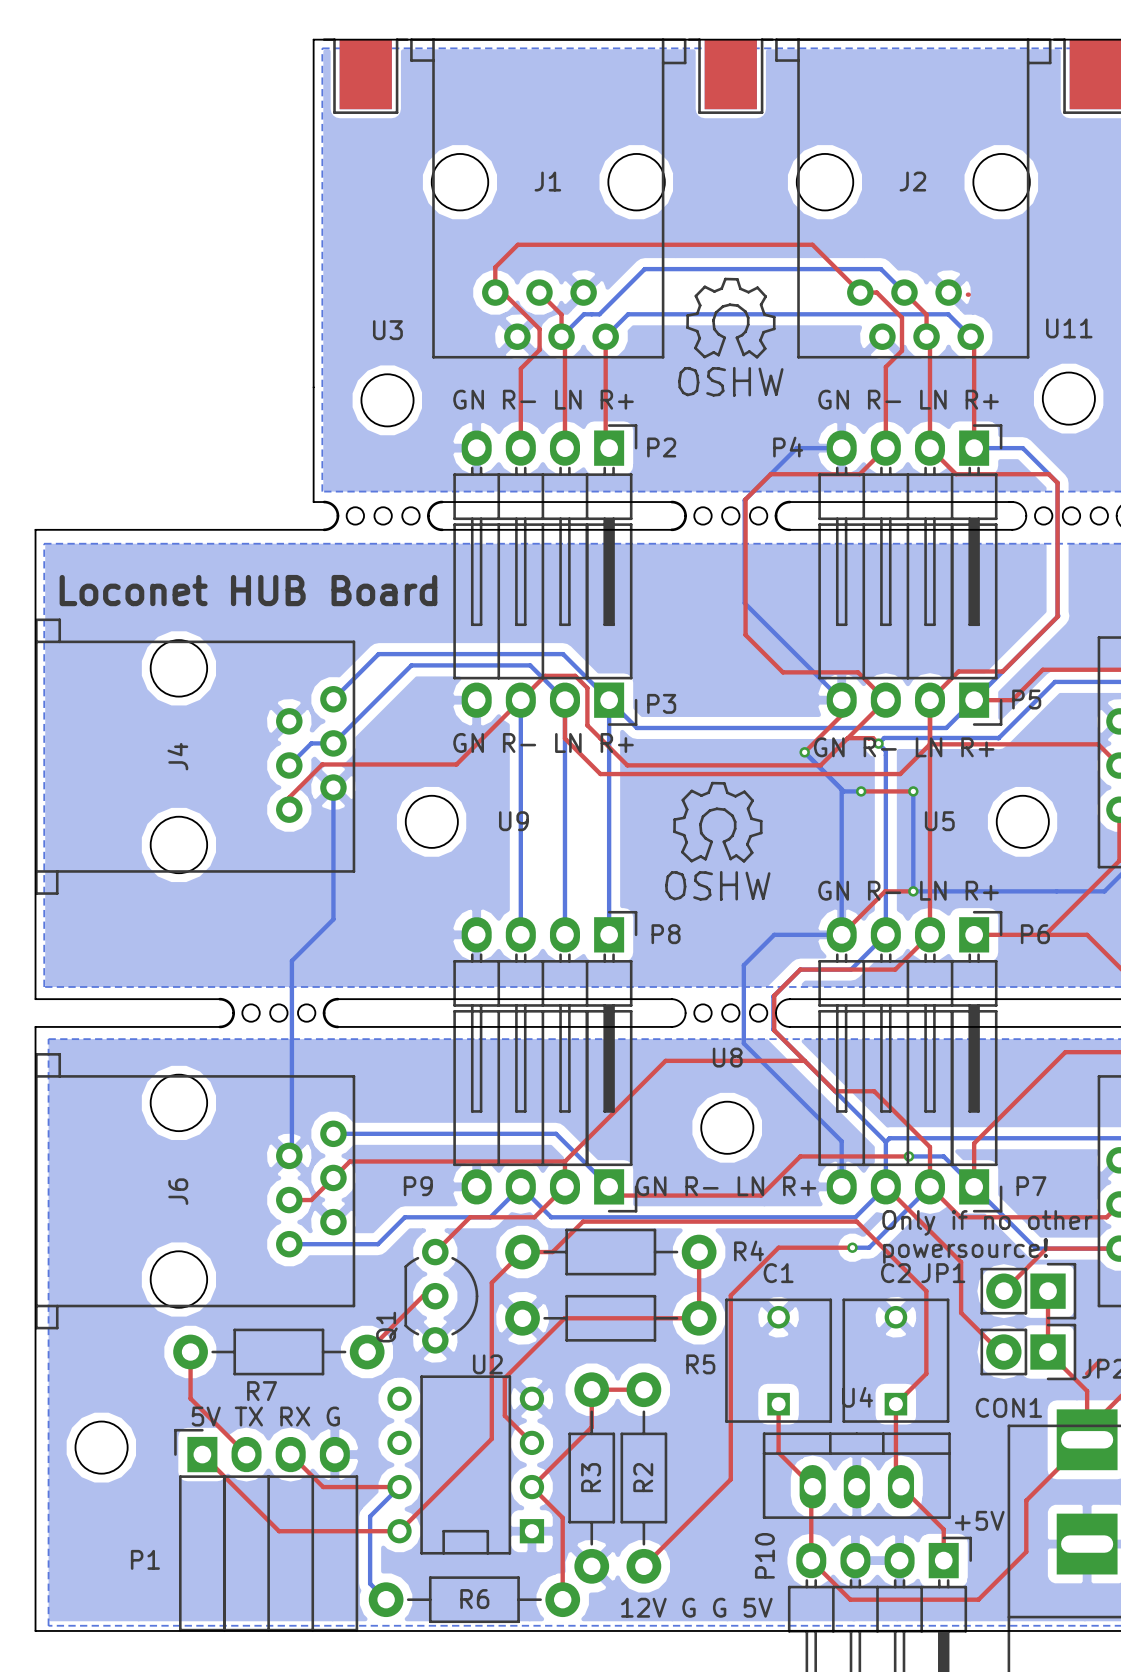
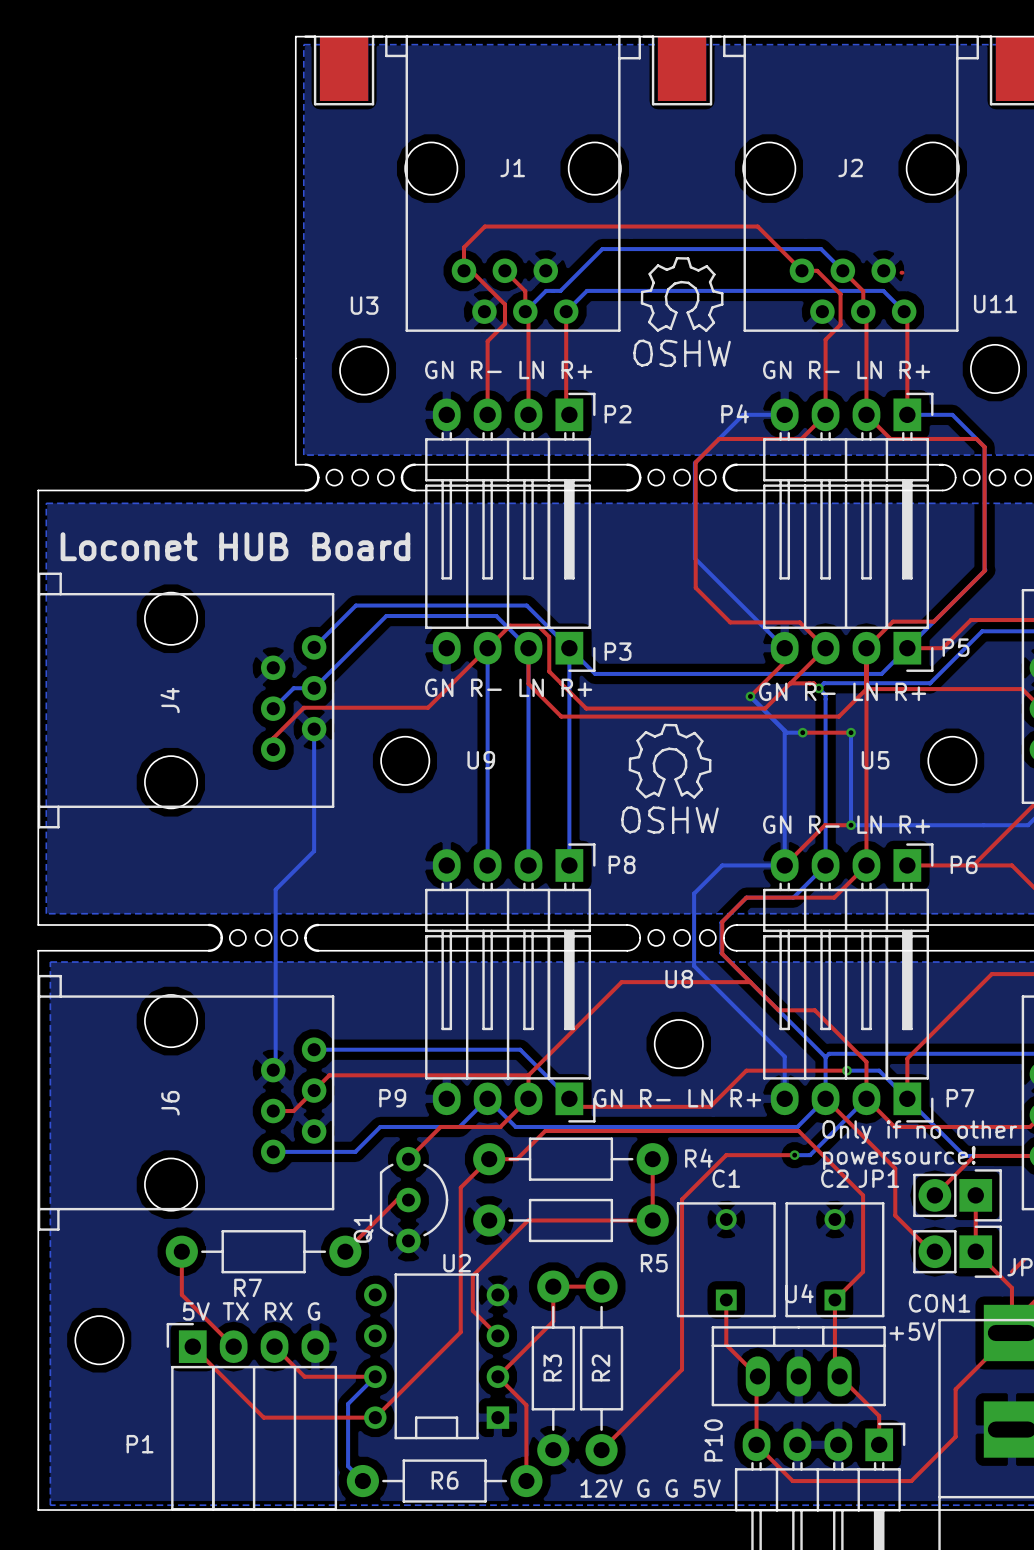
text position: +5V (979, 1520) -> +5V (912, 1331)

